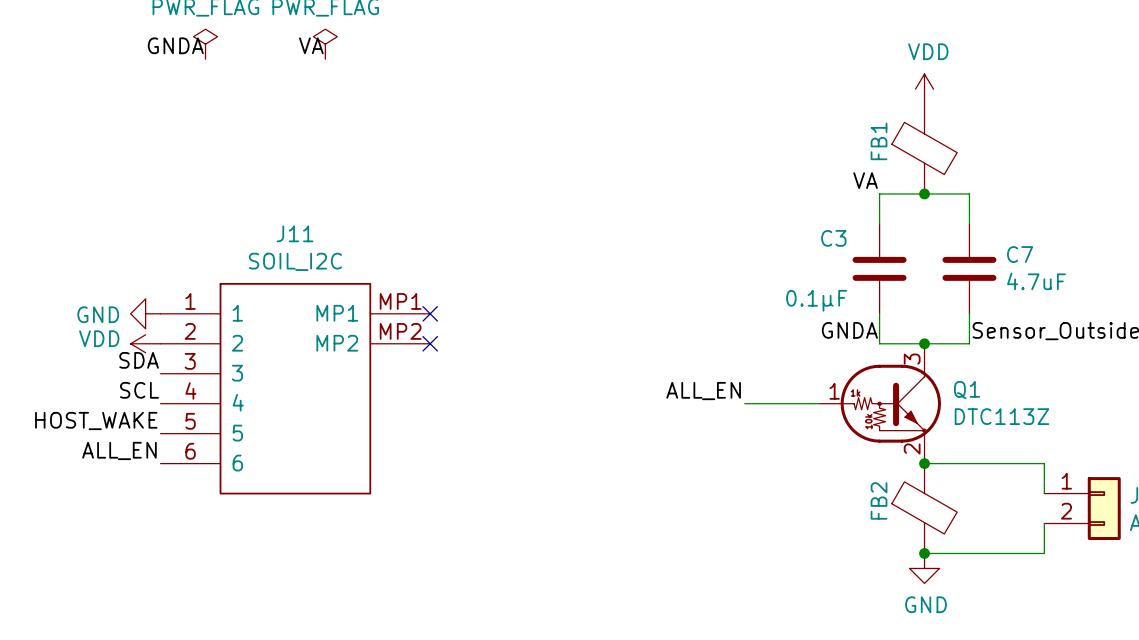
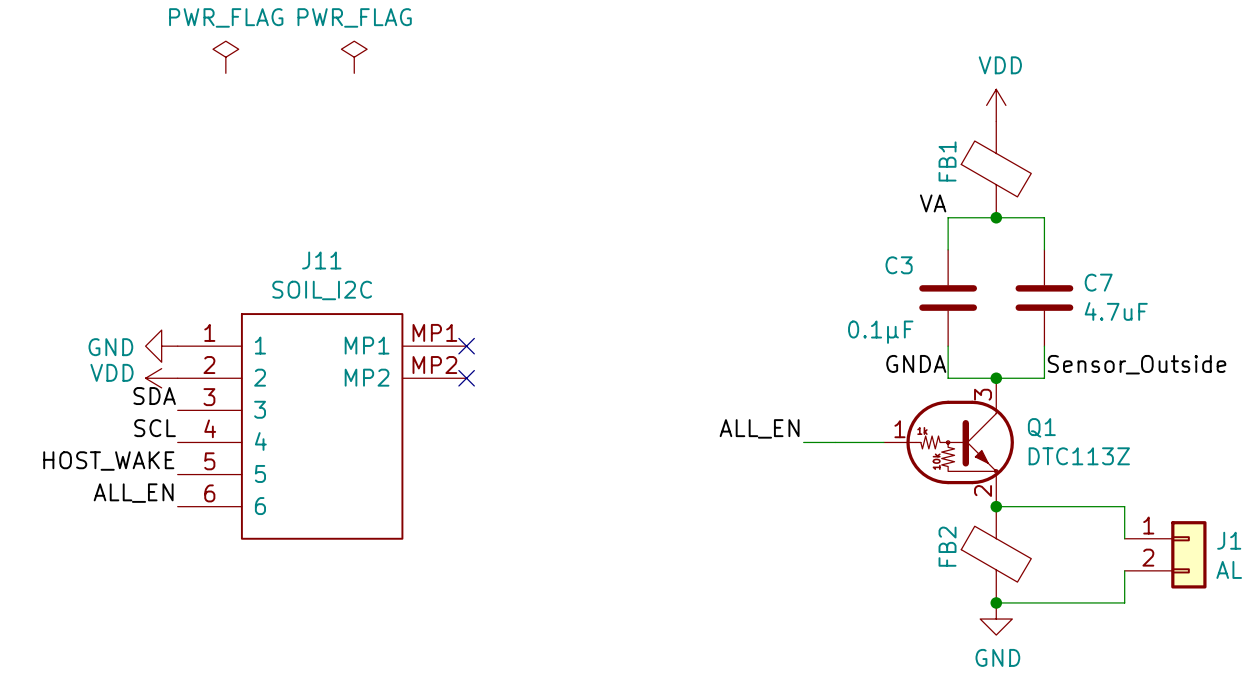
label: GNDA (175, 45) -> none
label: VA (311, 45) -> none

